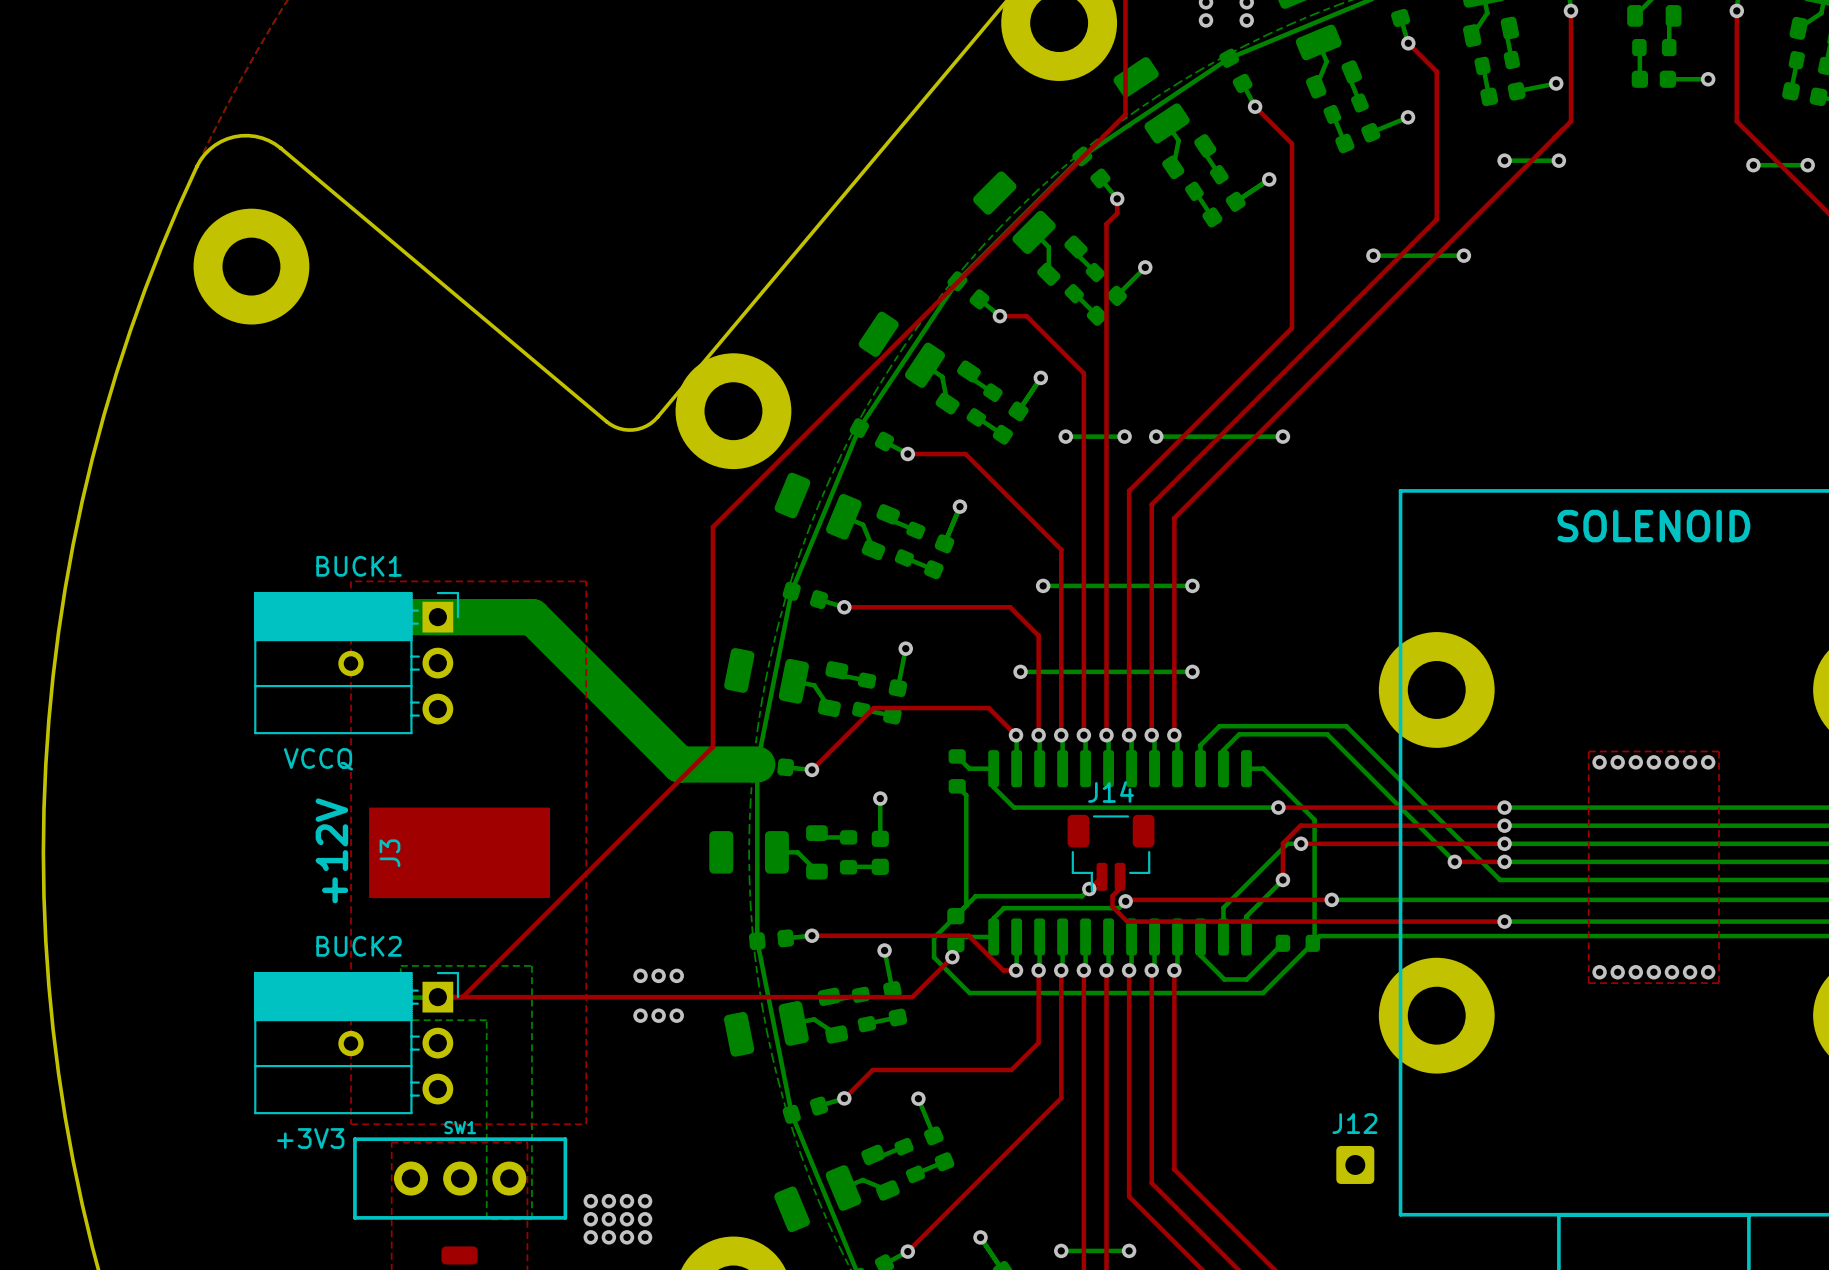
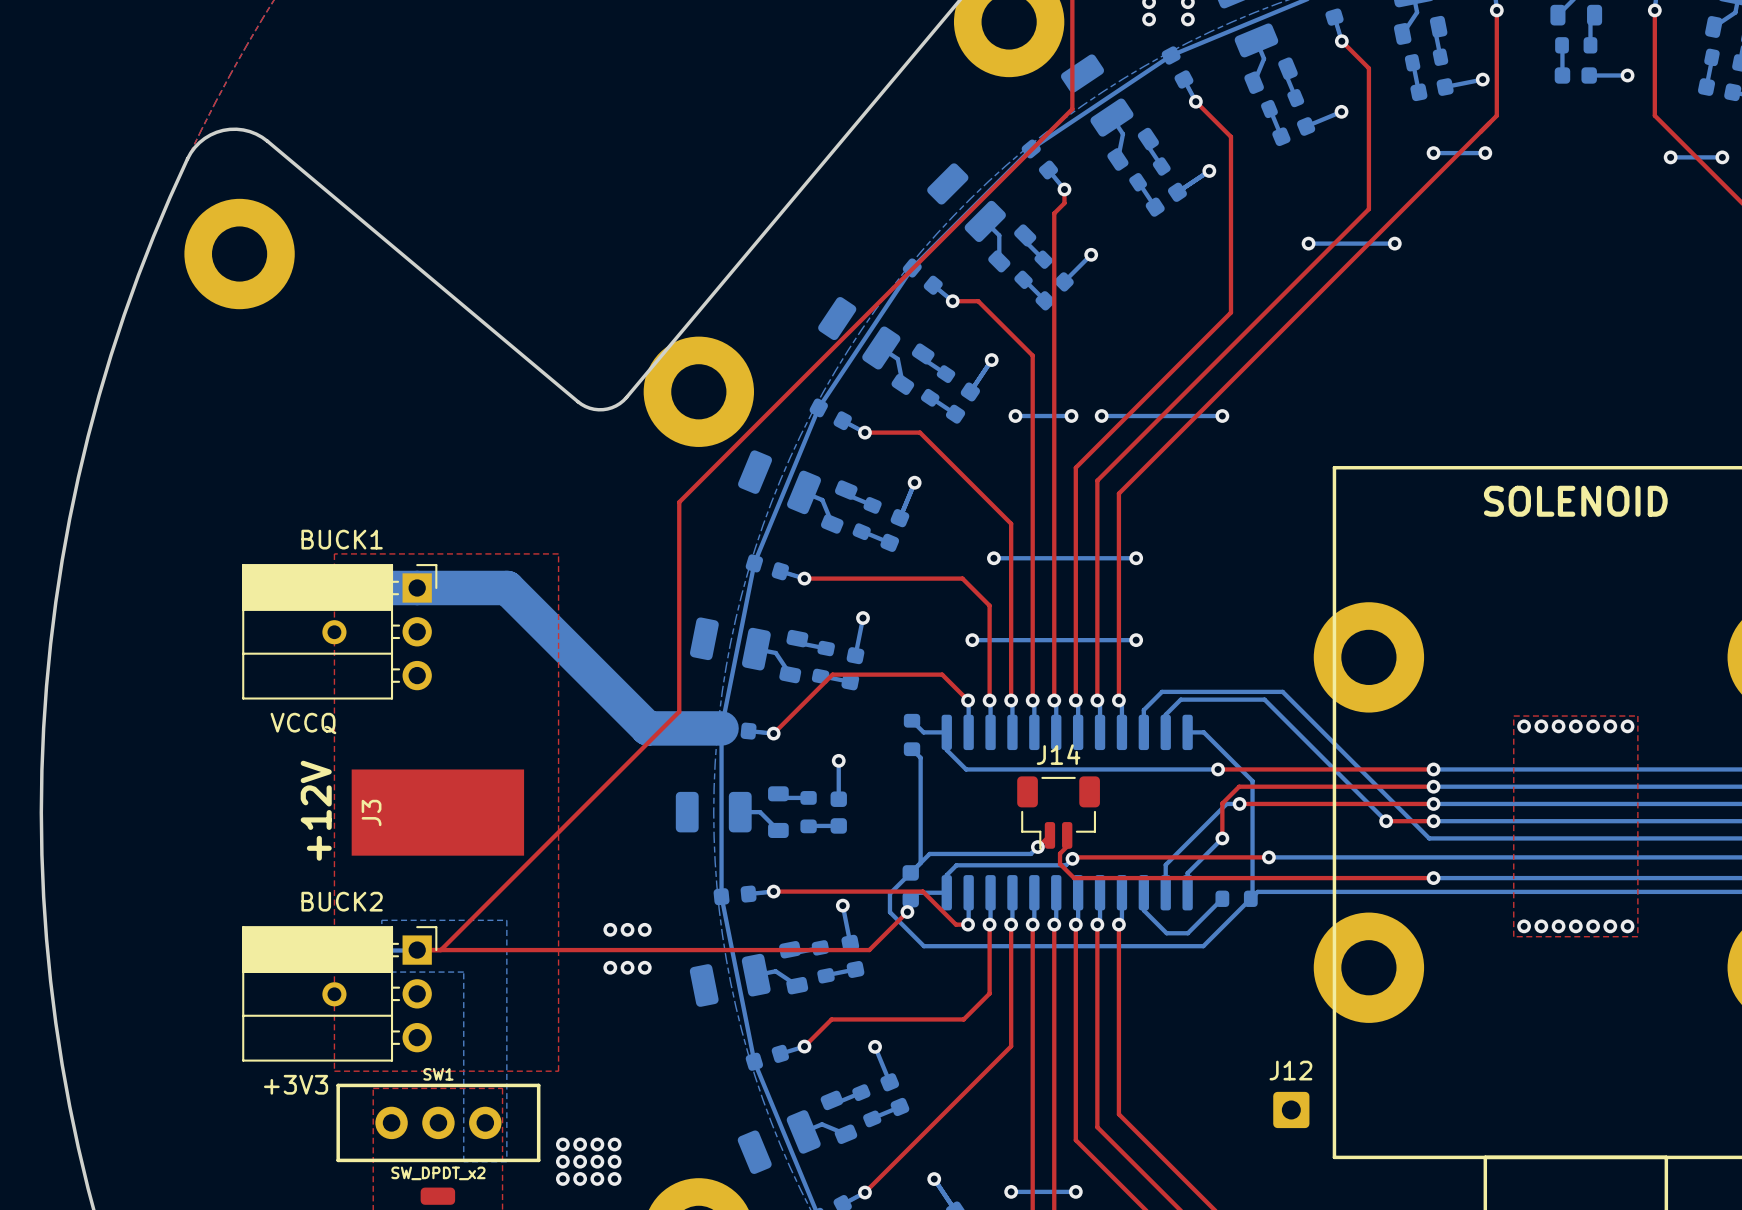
SW1 value: none -> SW_DPDT_x2 (438, 1173)

